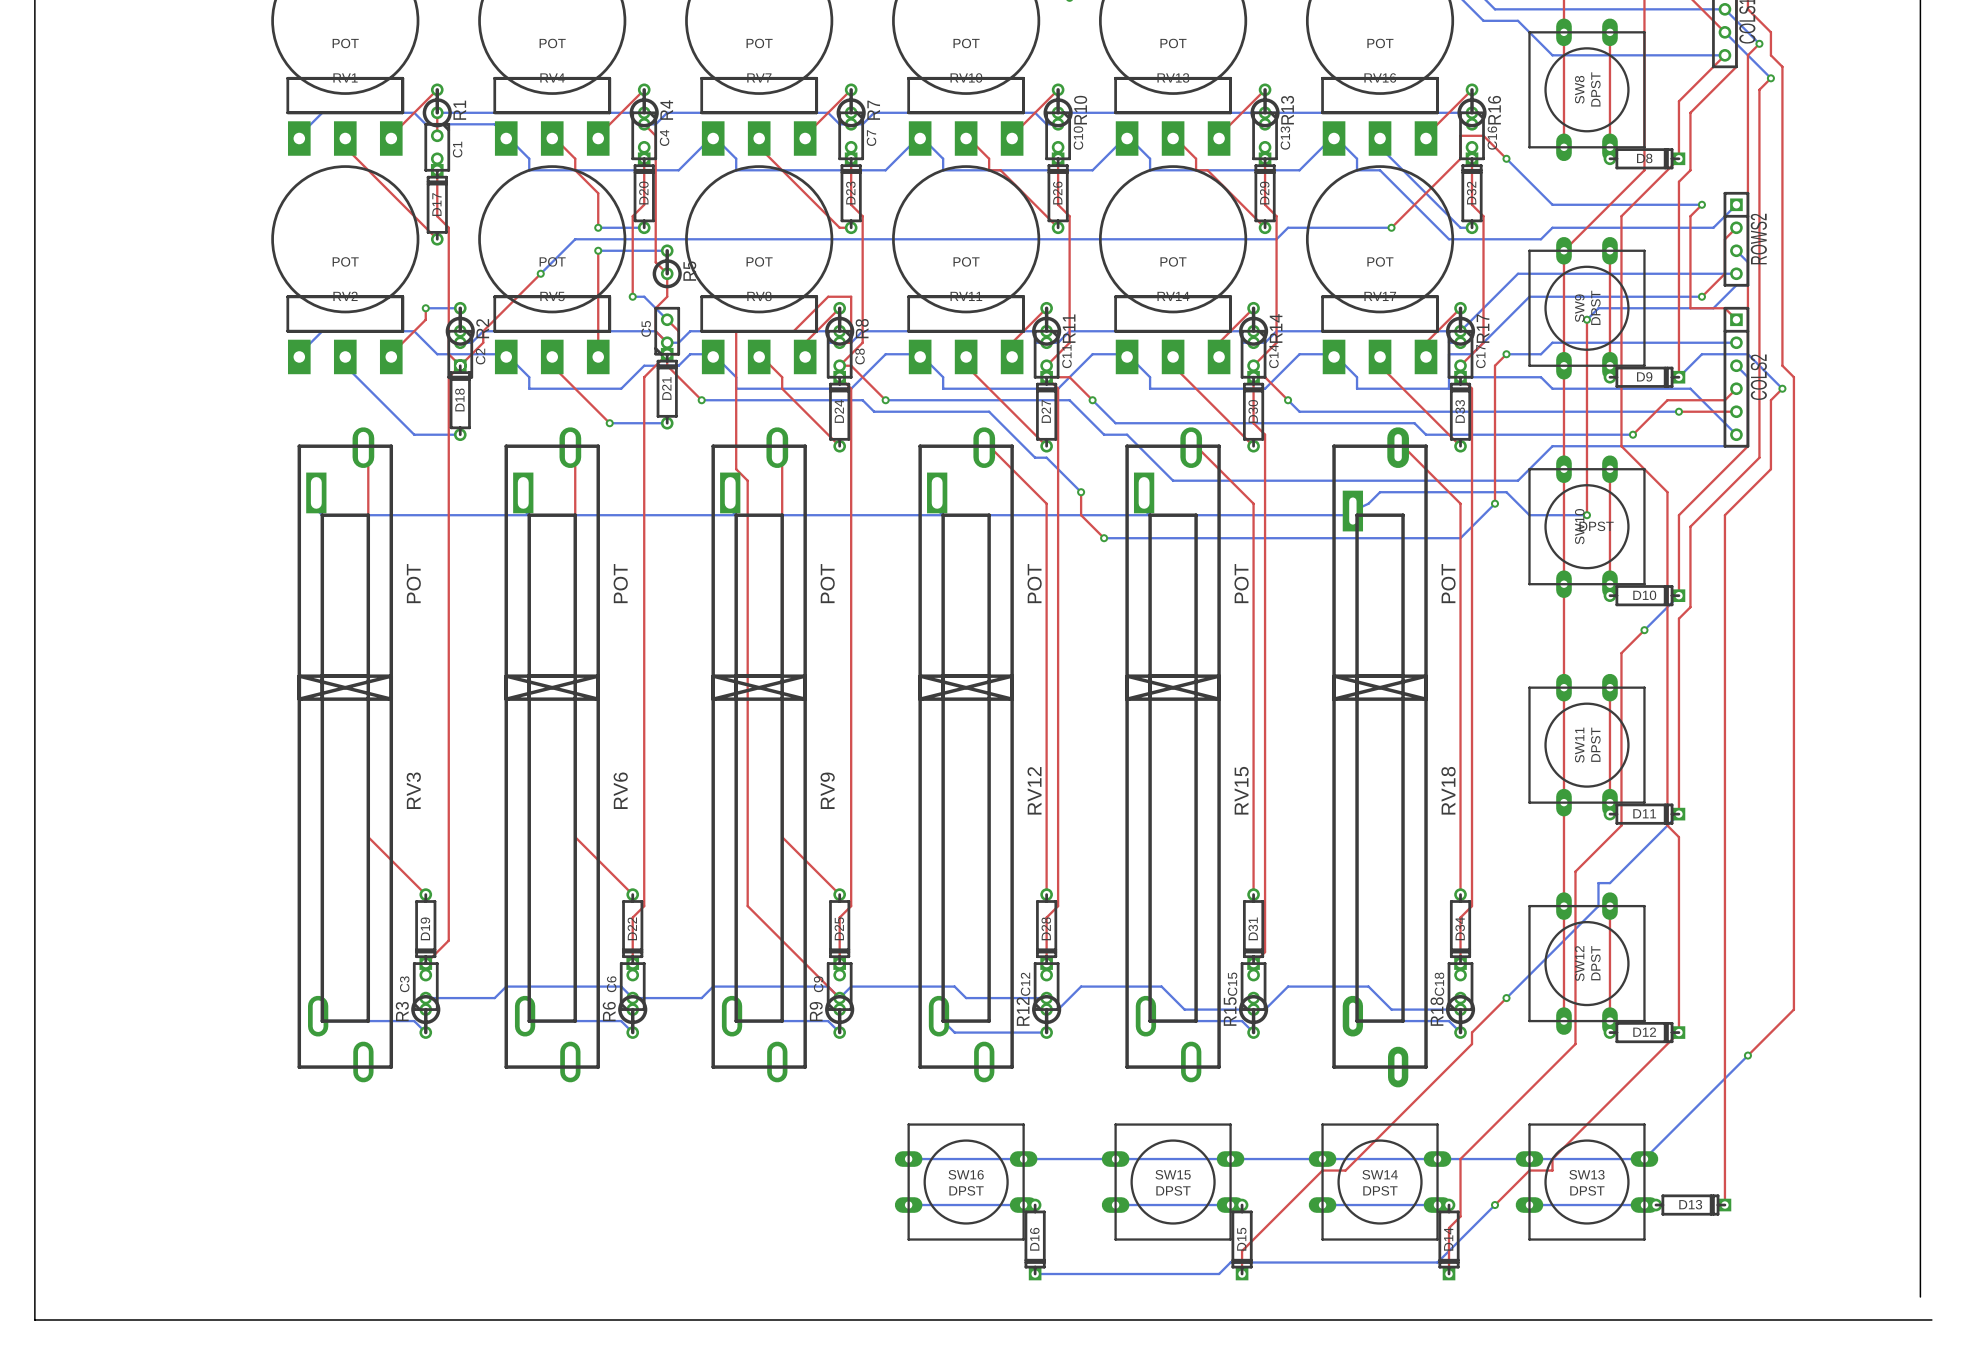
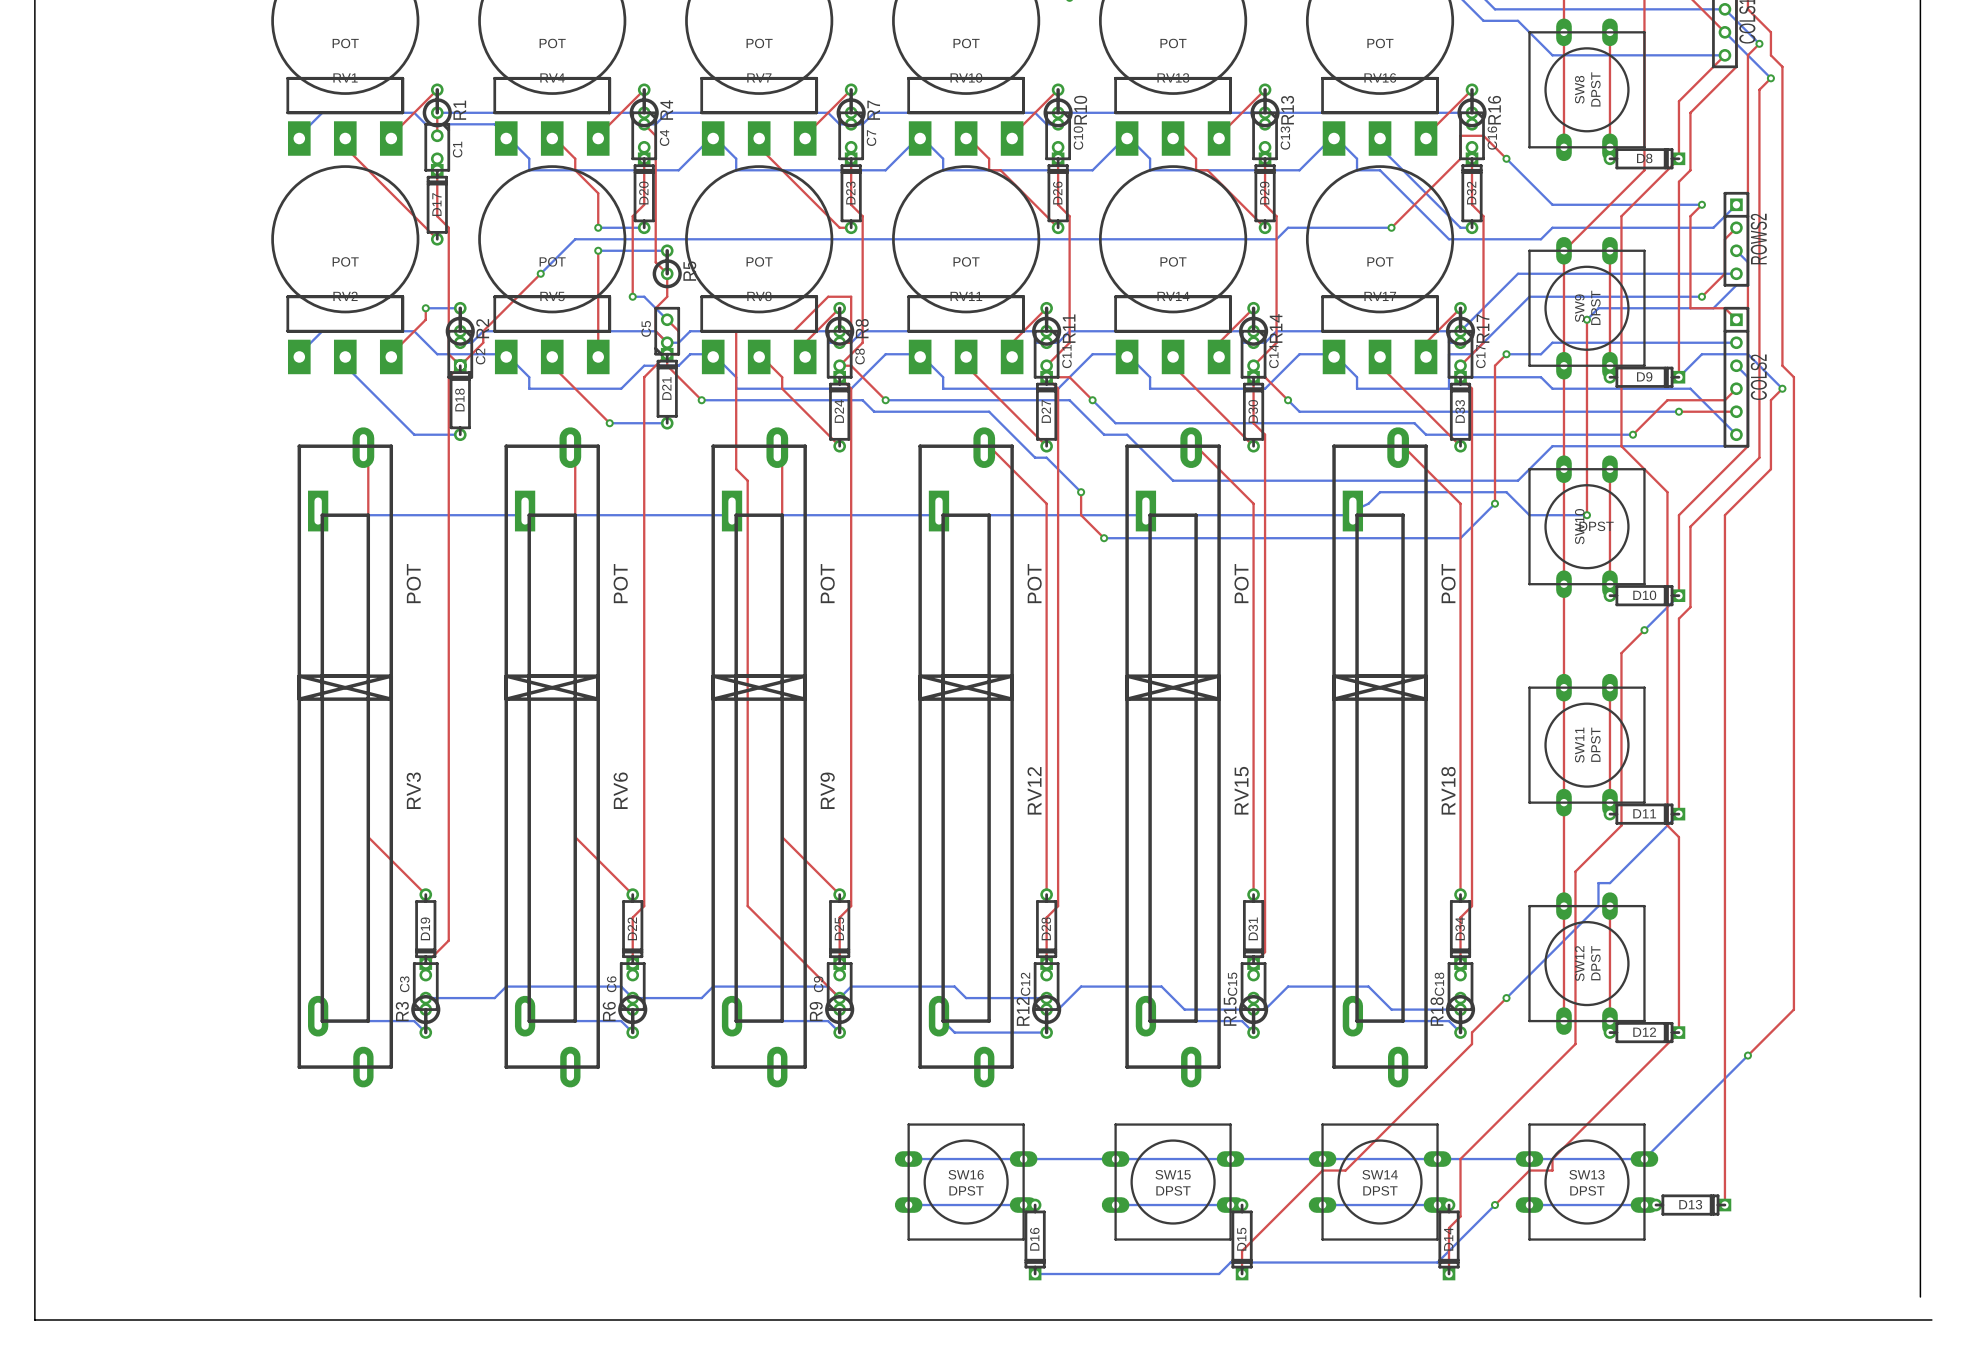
RV3 footprint: [297, 427, 394, 1083] -> [297, 427, 394, 1088]
RV6 footprint: [504, 427, 600, 1083] -> [504, 427, 600, 1088]
RV9 footprint: [711, 427, 807, 1083] -> [711, 427, 807, 1088]
RV12 footprint: [918, 427, 1014, 1083] -> [918, 427, 1014, 1088]
RV15 footprint: [1125, 427, 1221, 1083] -> [1125, 427, 1221, 1088]

